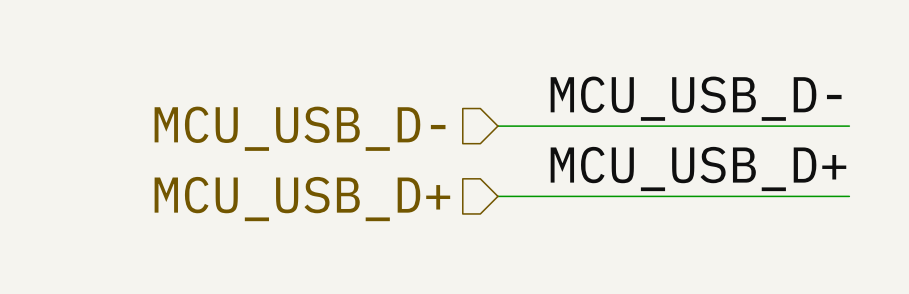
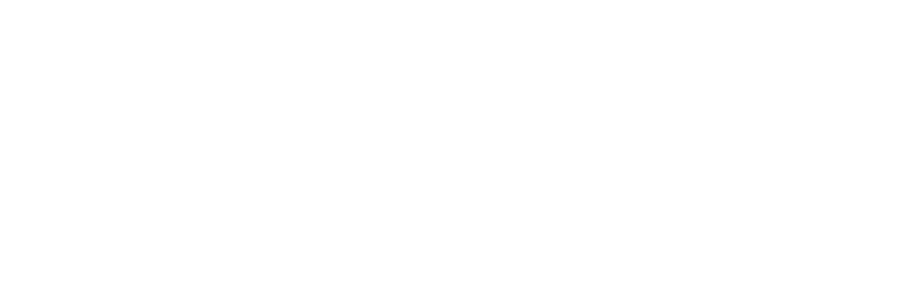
label: MCU_USB_D- (696, 98) -> none
wire: (497, 126) (849, 126) -> none
hierarchical label: MCU_USB_D- (300, 128) -> none
label: MCU_USB_D+ (698, 168) -> none
wire: (497, 196) (849, 196) -> none
hierarchical label: MCU_USB_D+ (302, 199) -> none

